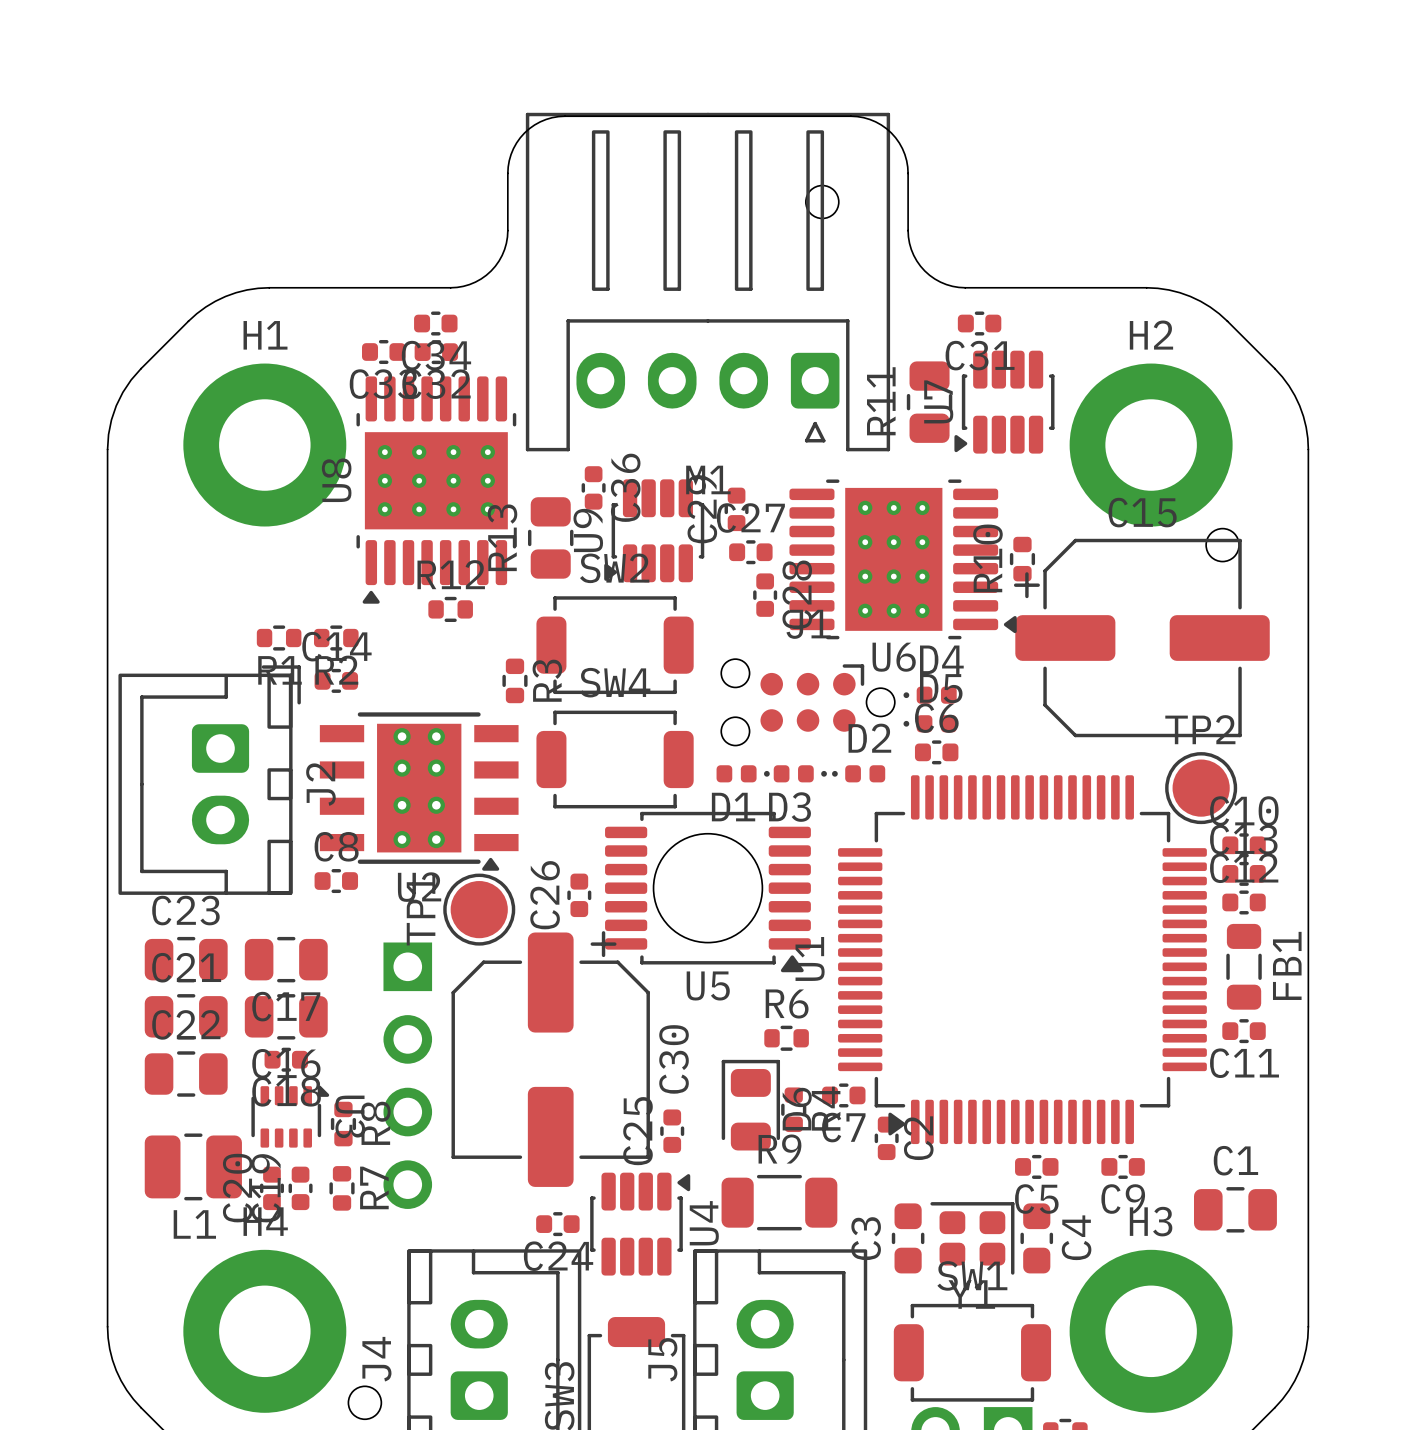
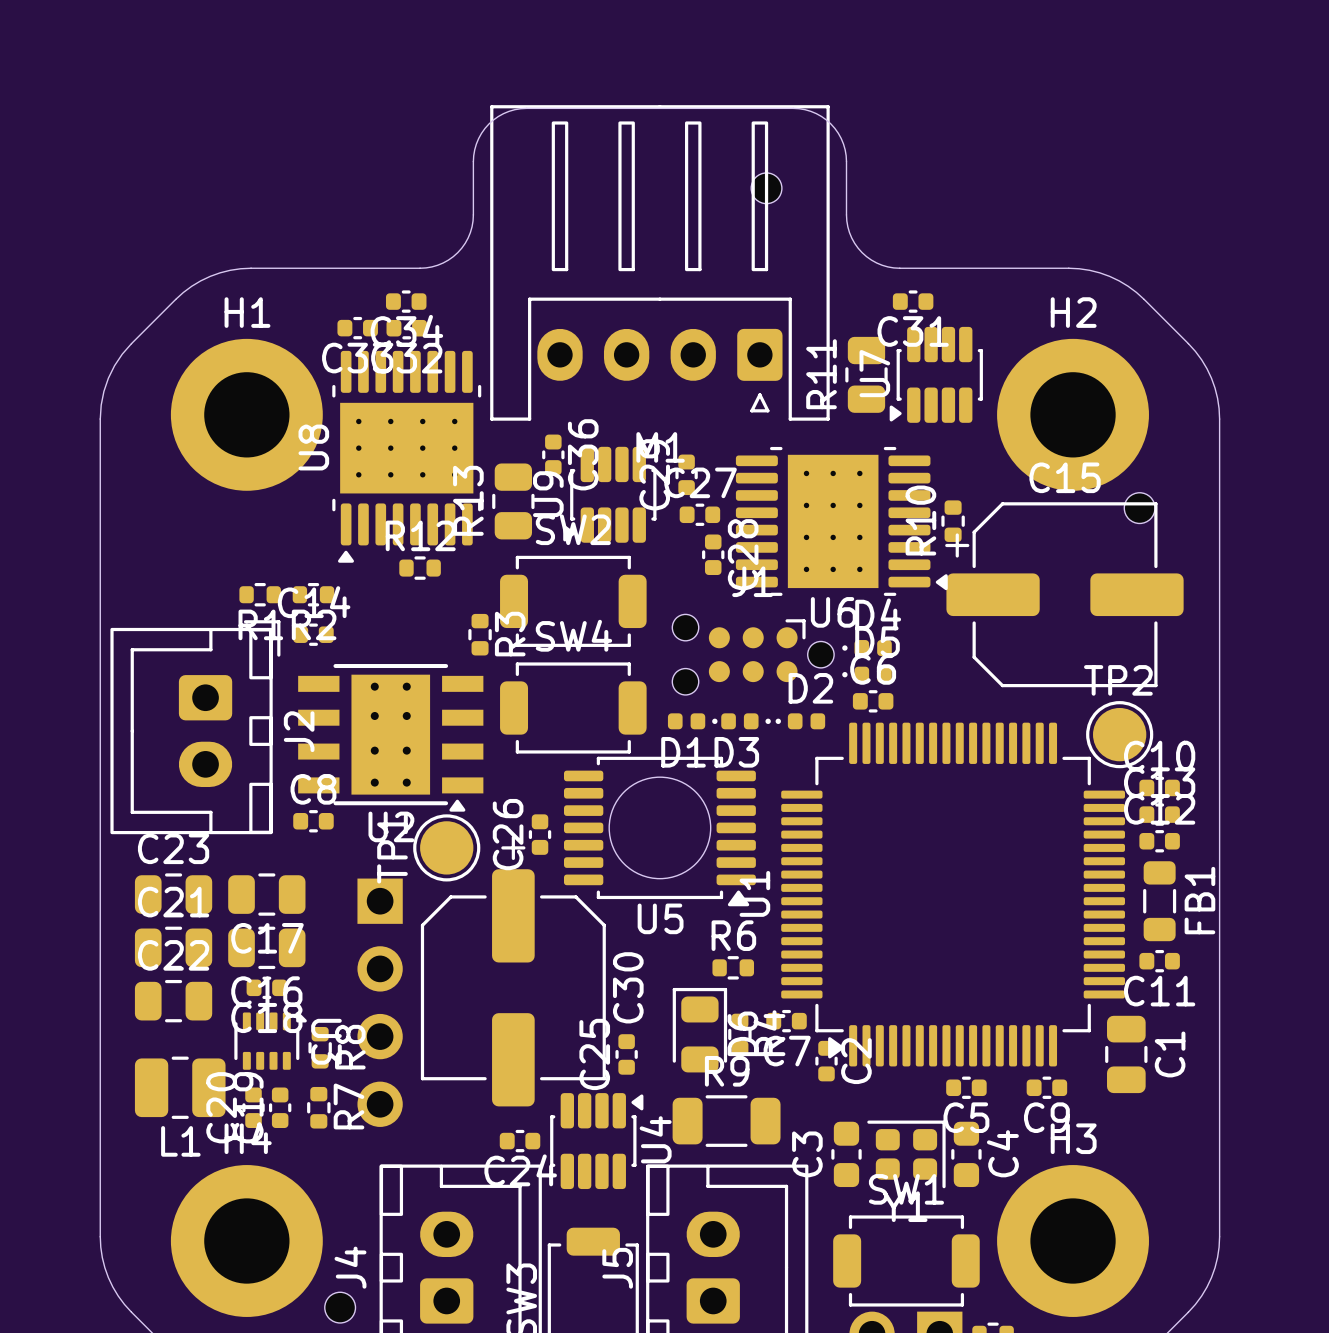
C30 footprint: [451, 931, 650, 1187] -> [420, 835, 606, 1107]
C1 rotation: 0° (1235, 1209) -> 90° clockwise (1126, 1054)
C1 position: (1235, 1209) -> (1126, 1054)

